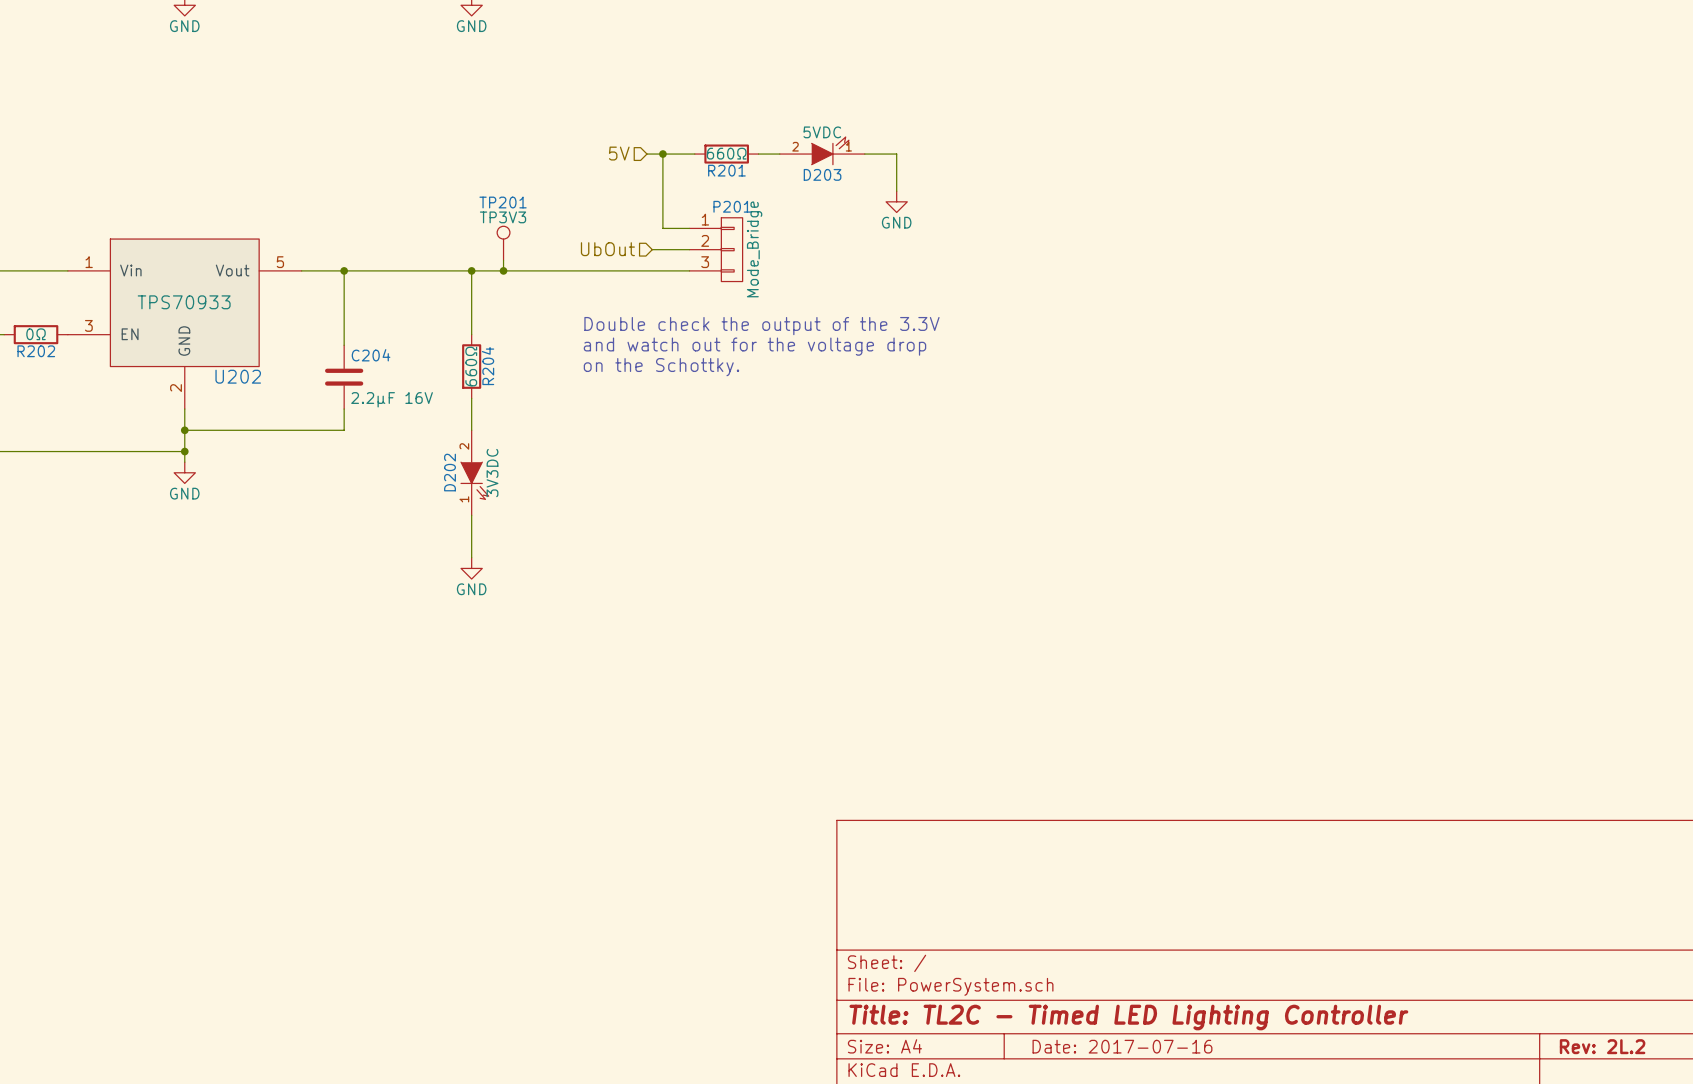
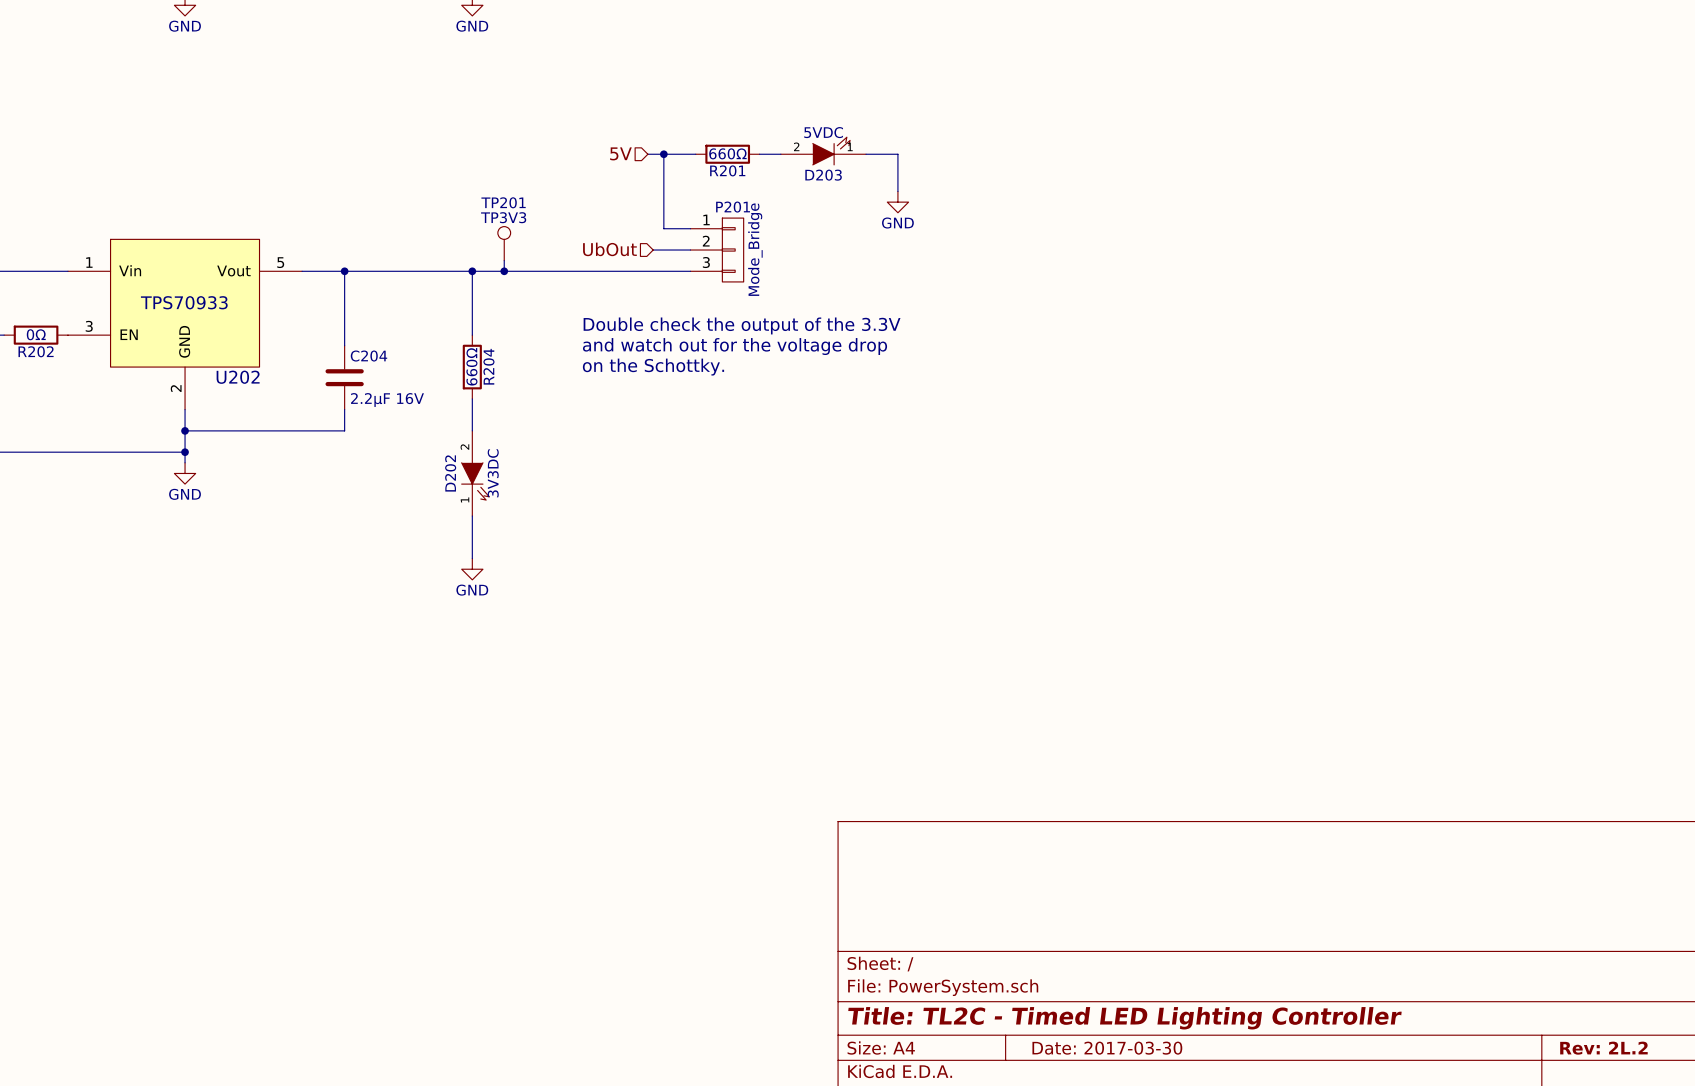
title block: Date: 2017-07-16 (1122, 1046) -> Date: 2017-03-30 (1107, 1048)

